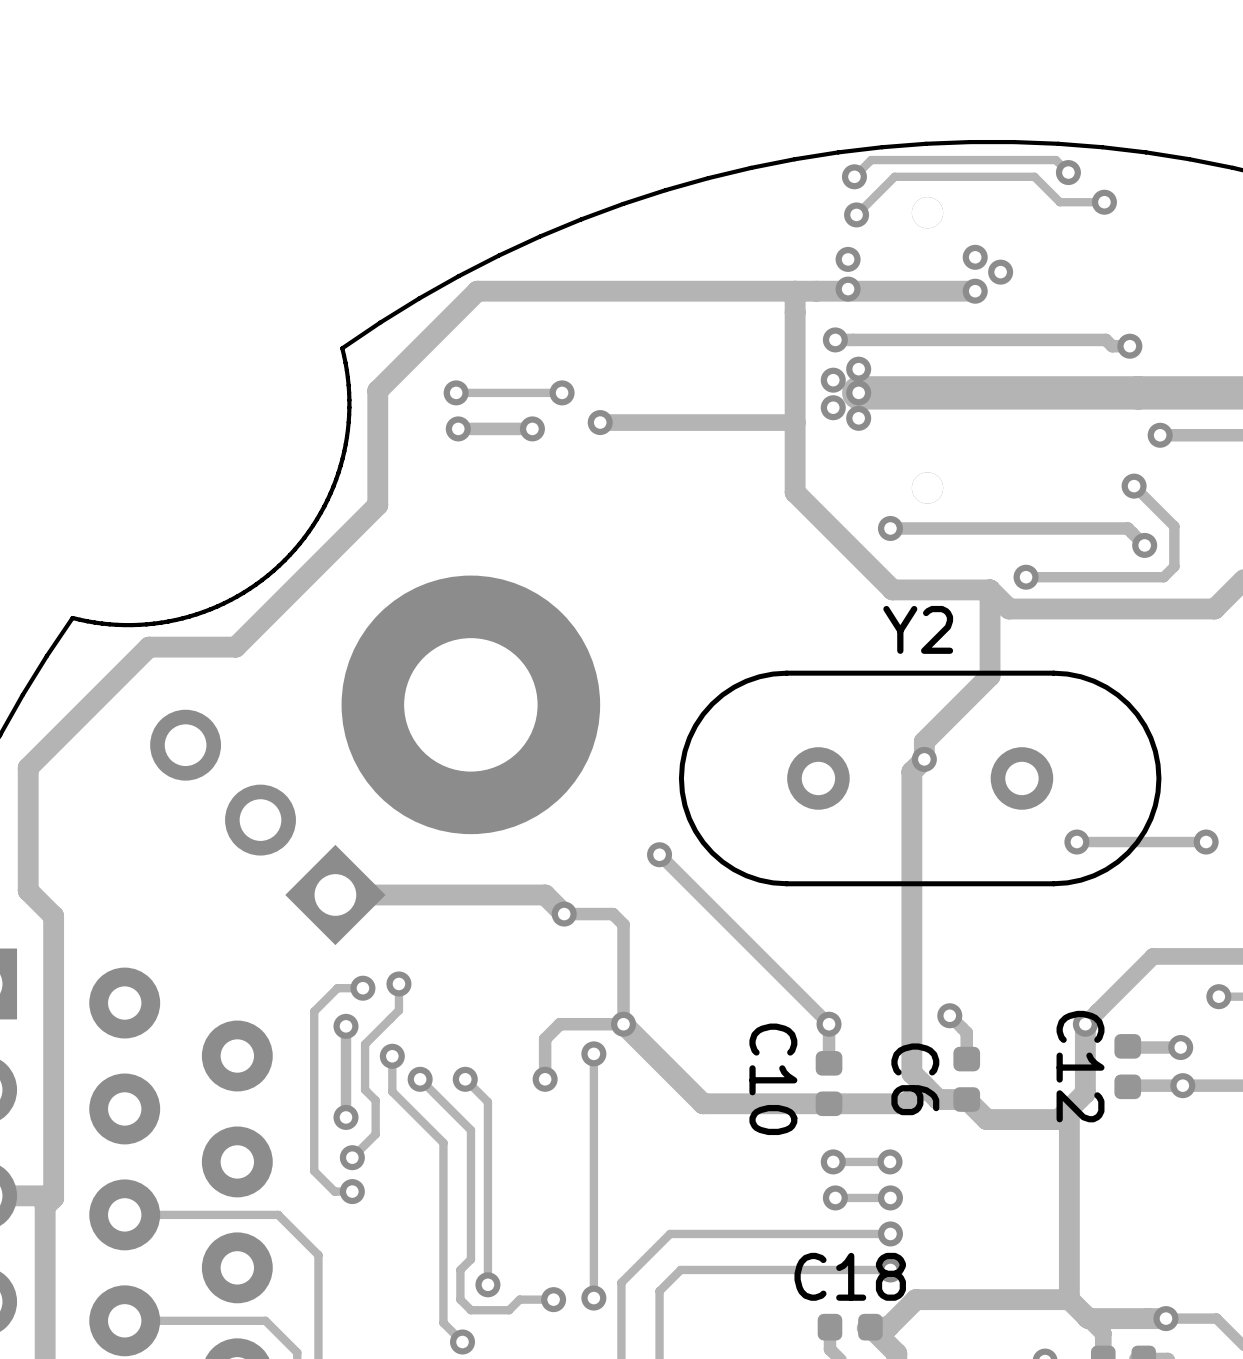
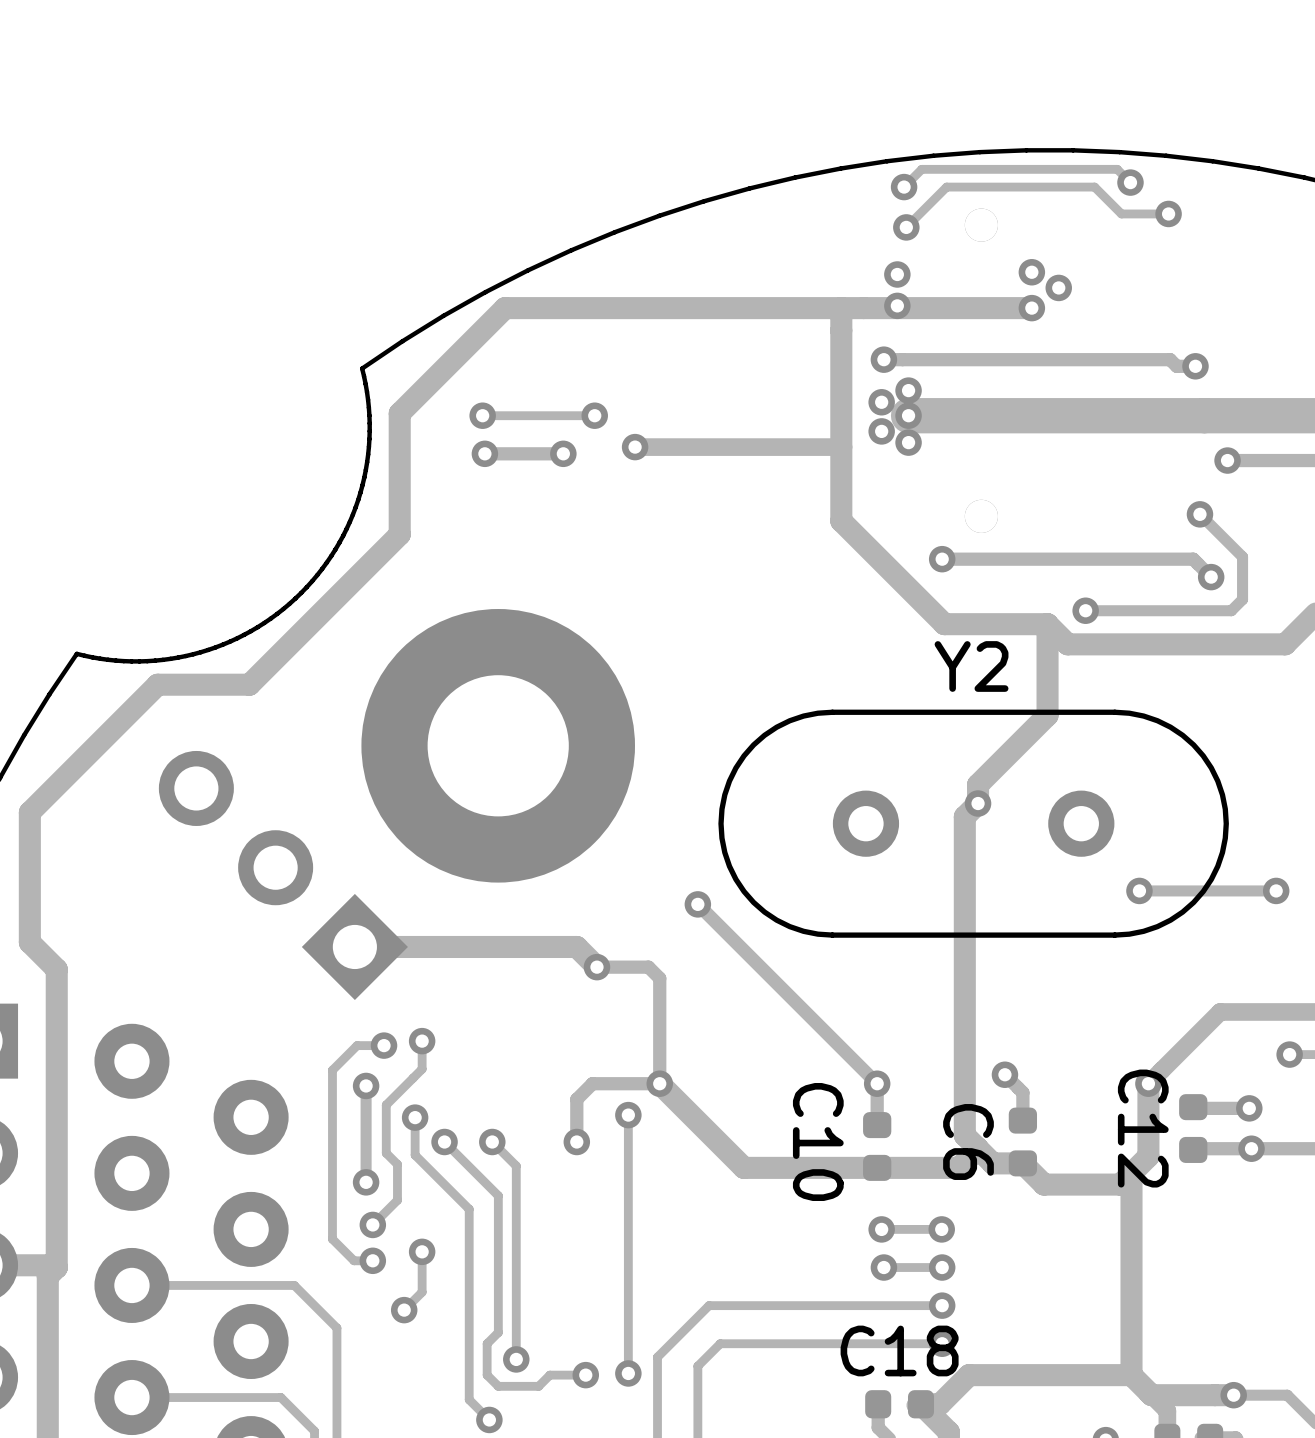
track: none -> (422, 1251) (422, 1292) (404, 1310)
via: none -> (422, 1251)
via: none -> (404, 1310)

